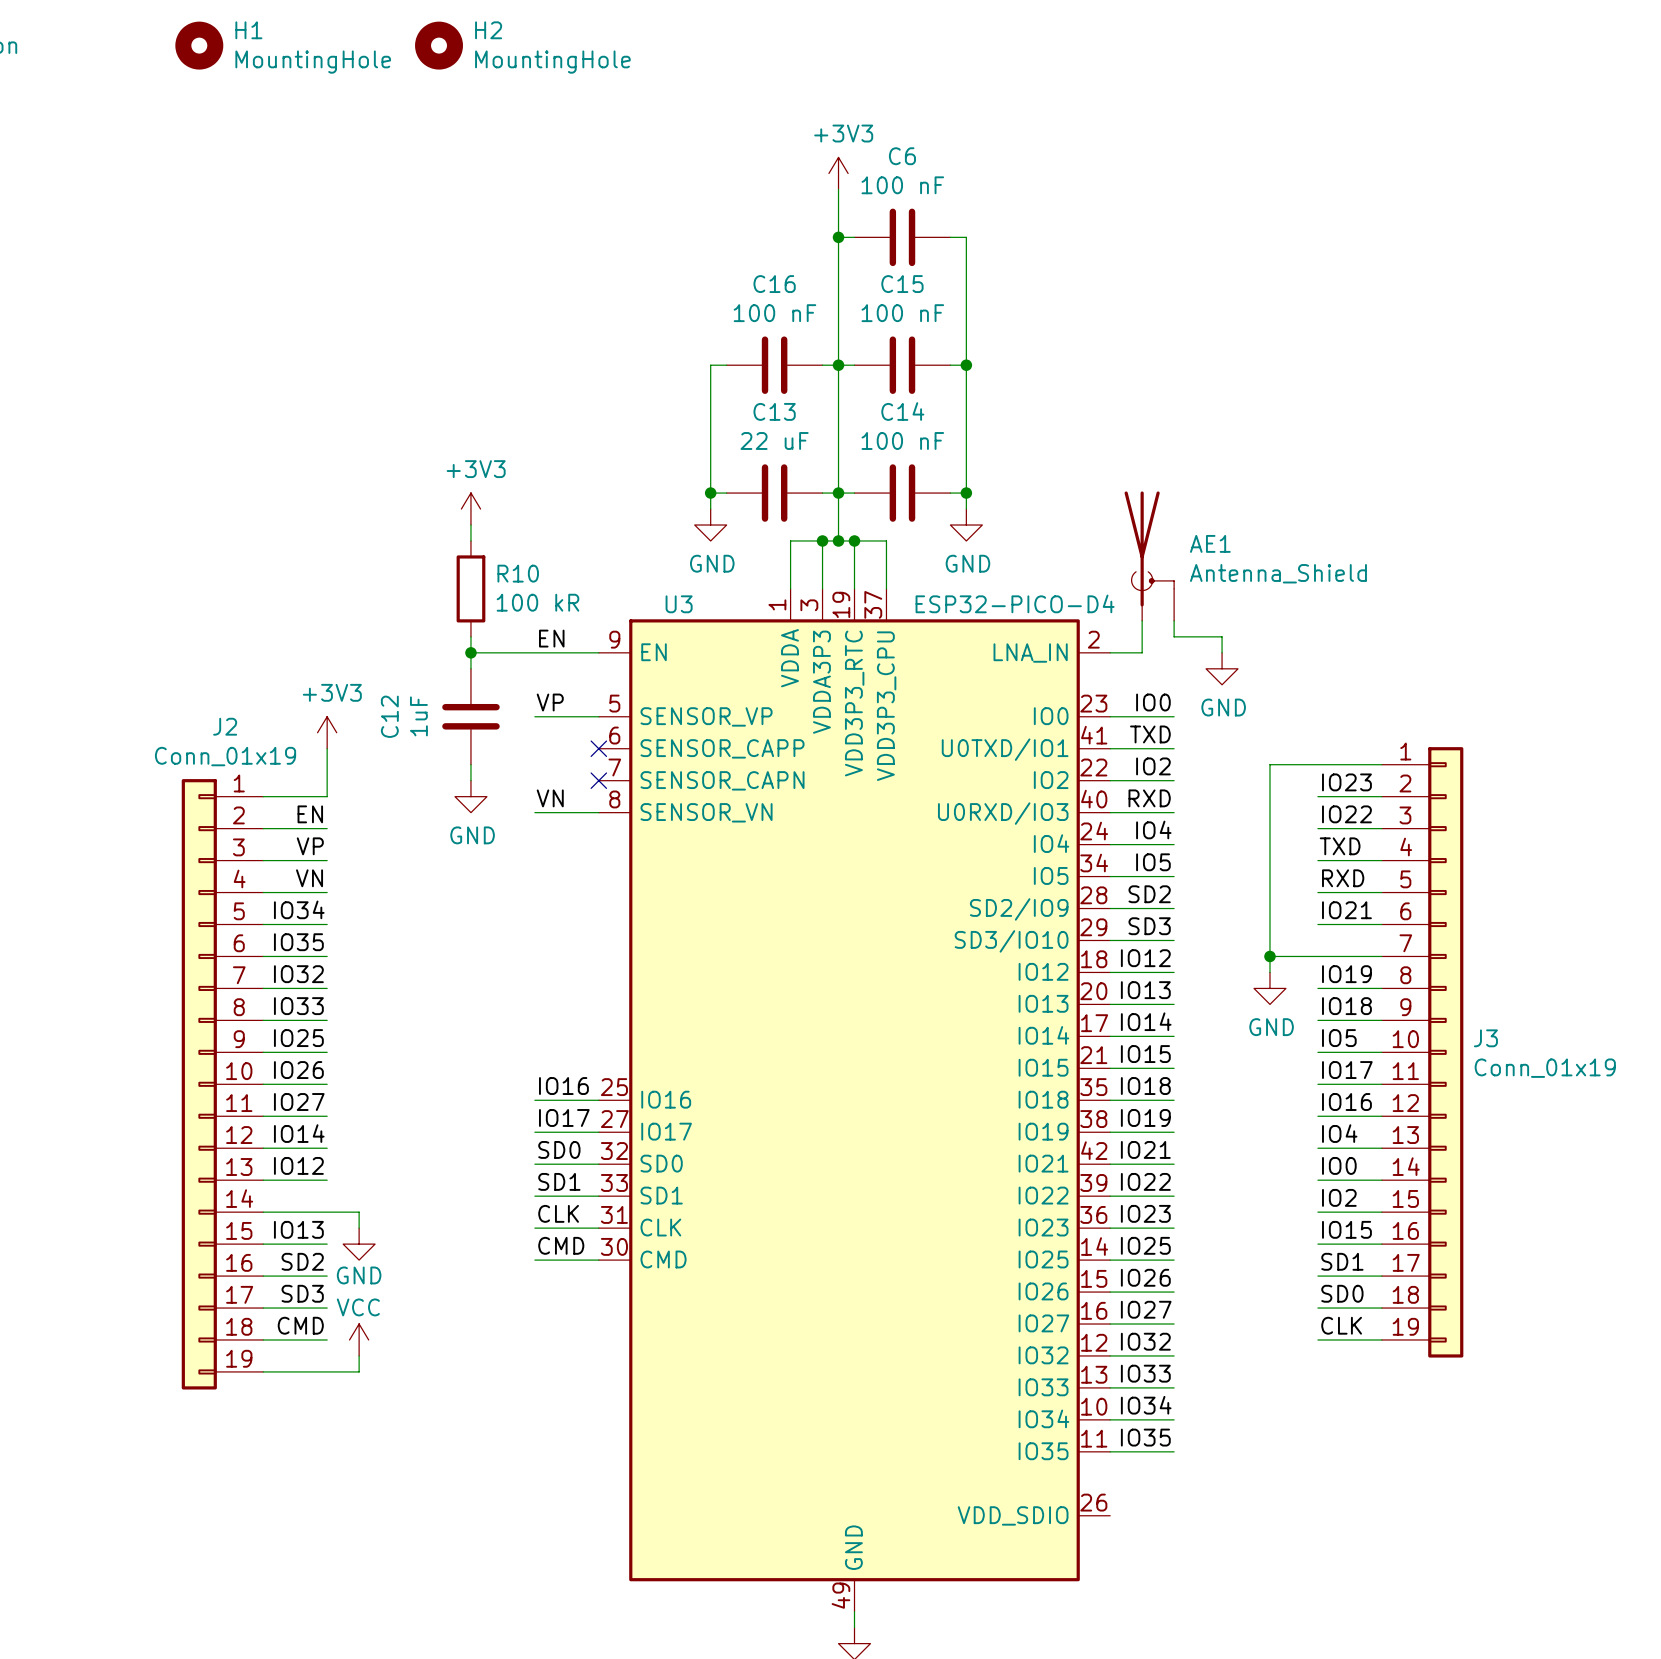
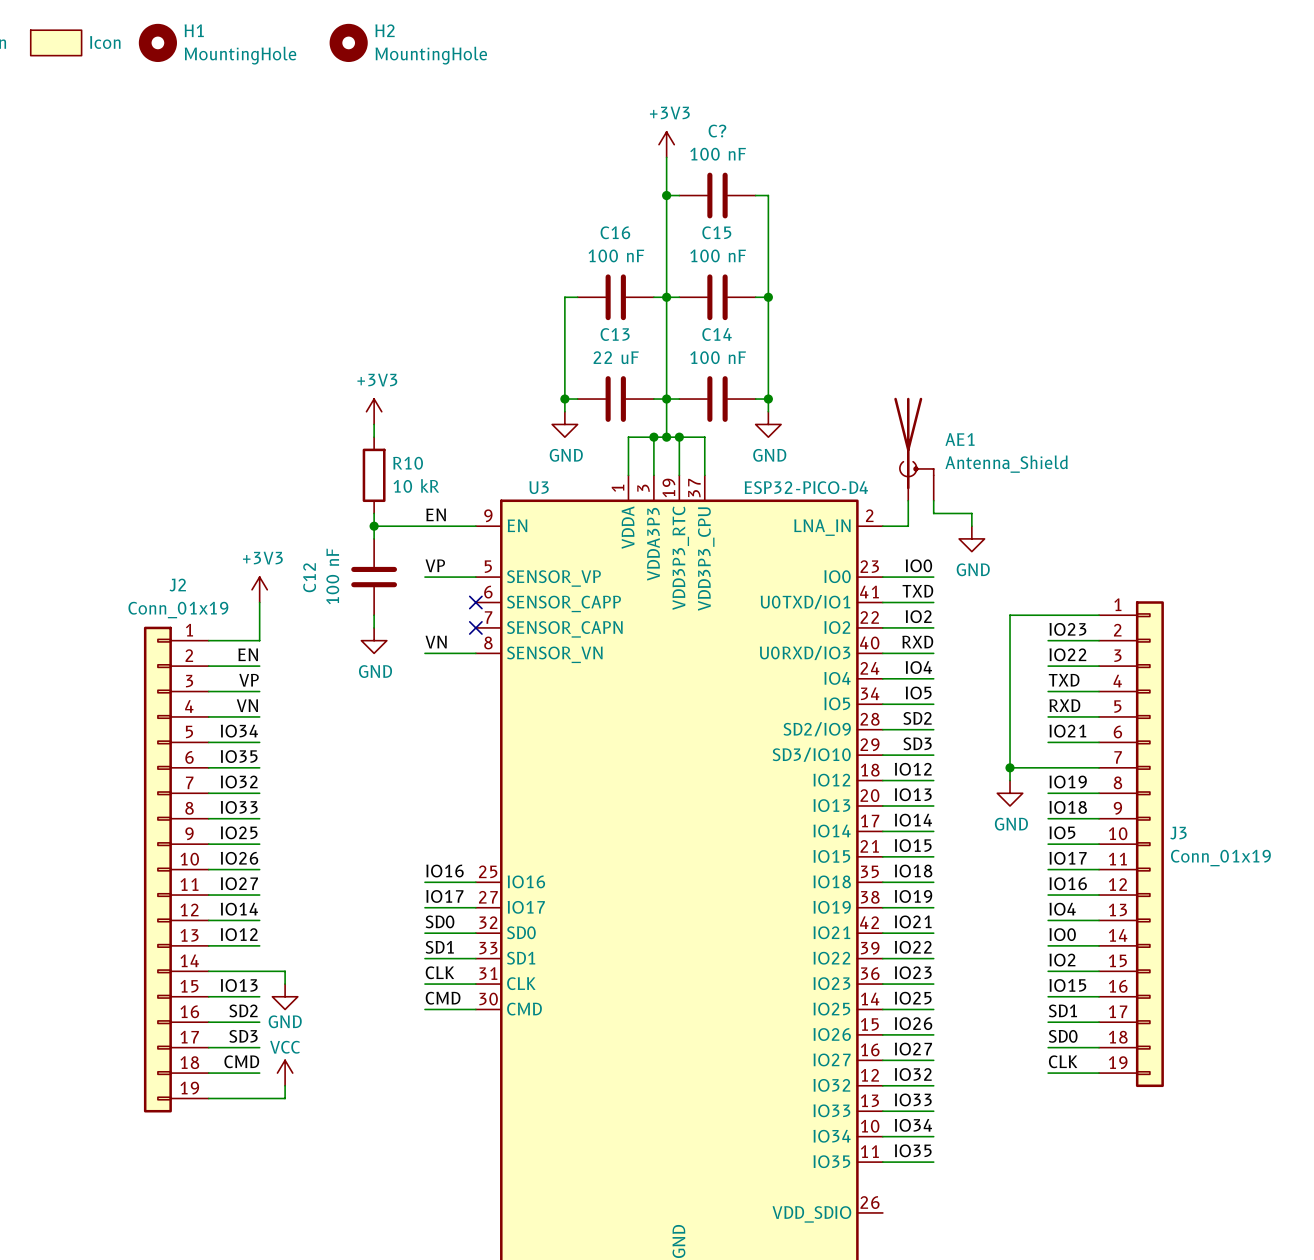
part: none -> Icon (56, 42)
C6 name: C6 (902, 156) -> C? (717, 131)
R10 value: 100 kR (537, 602) -> 10 kR (416, 485)
C12 value: 1uF (418, 716) -> 100 nF (332, 576)

